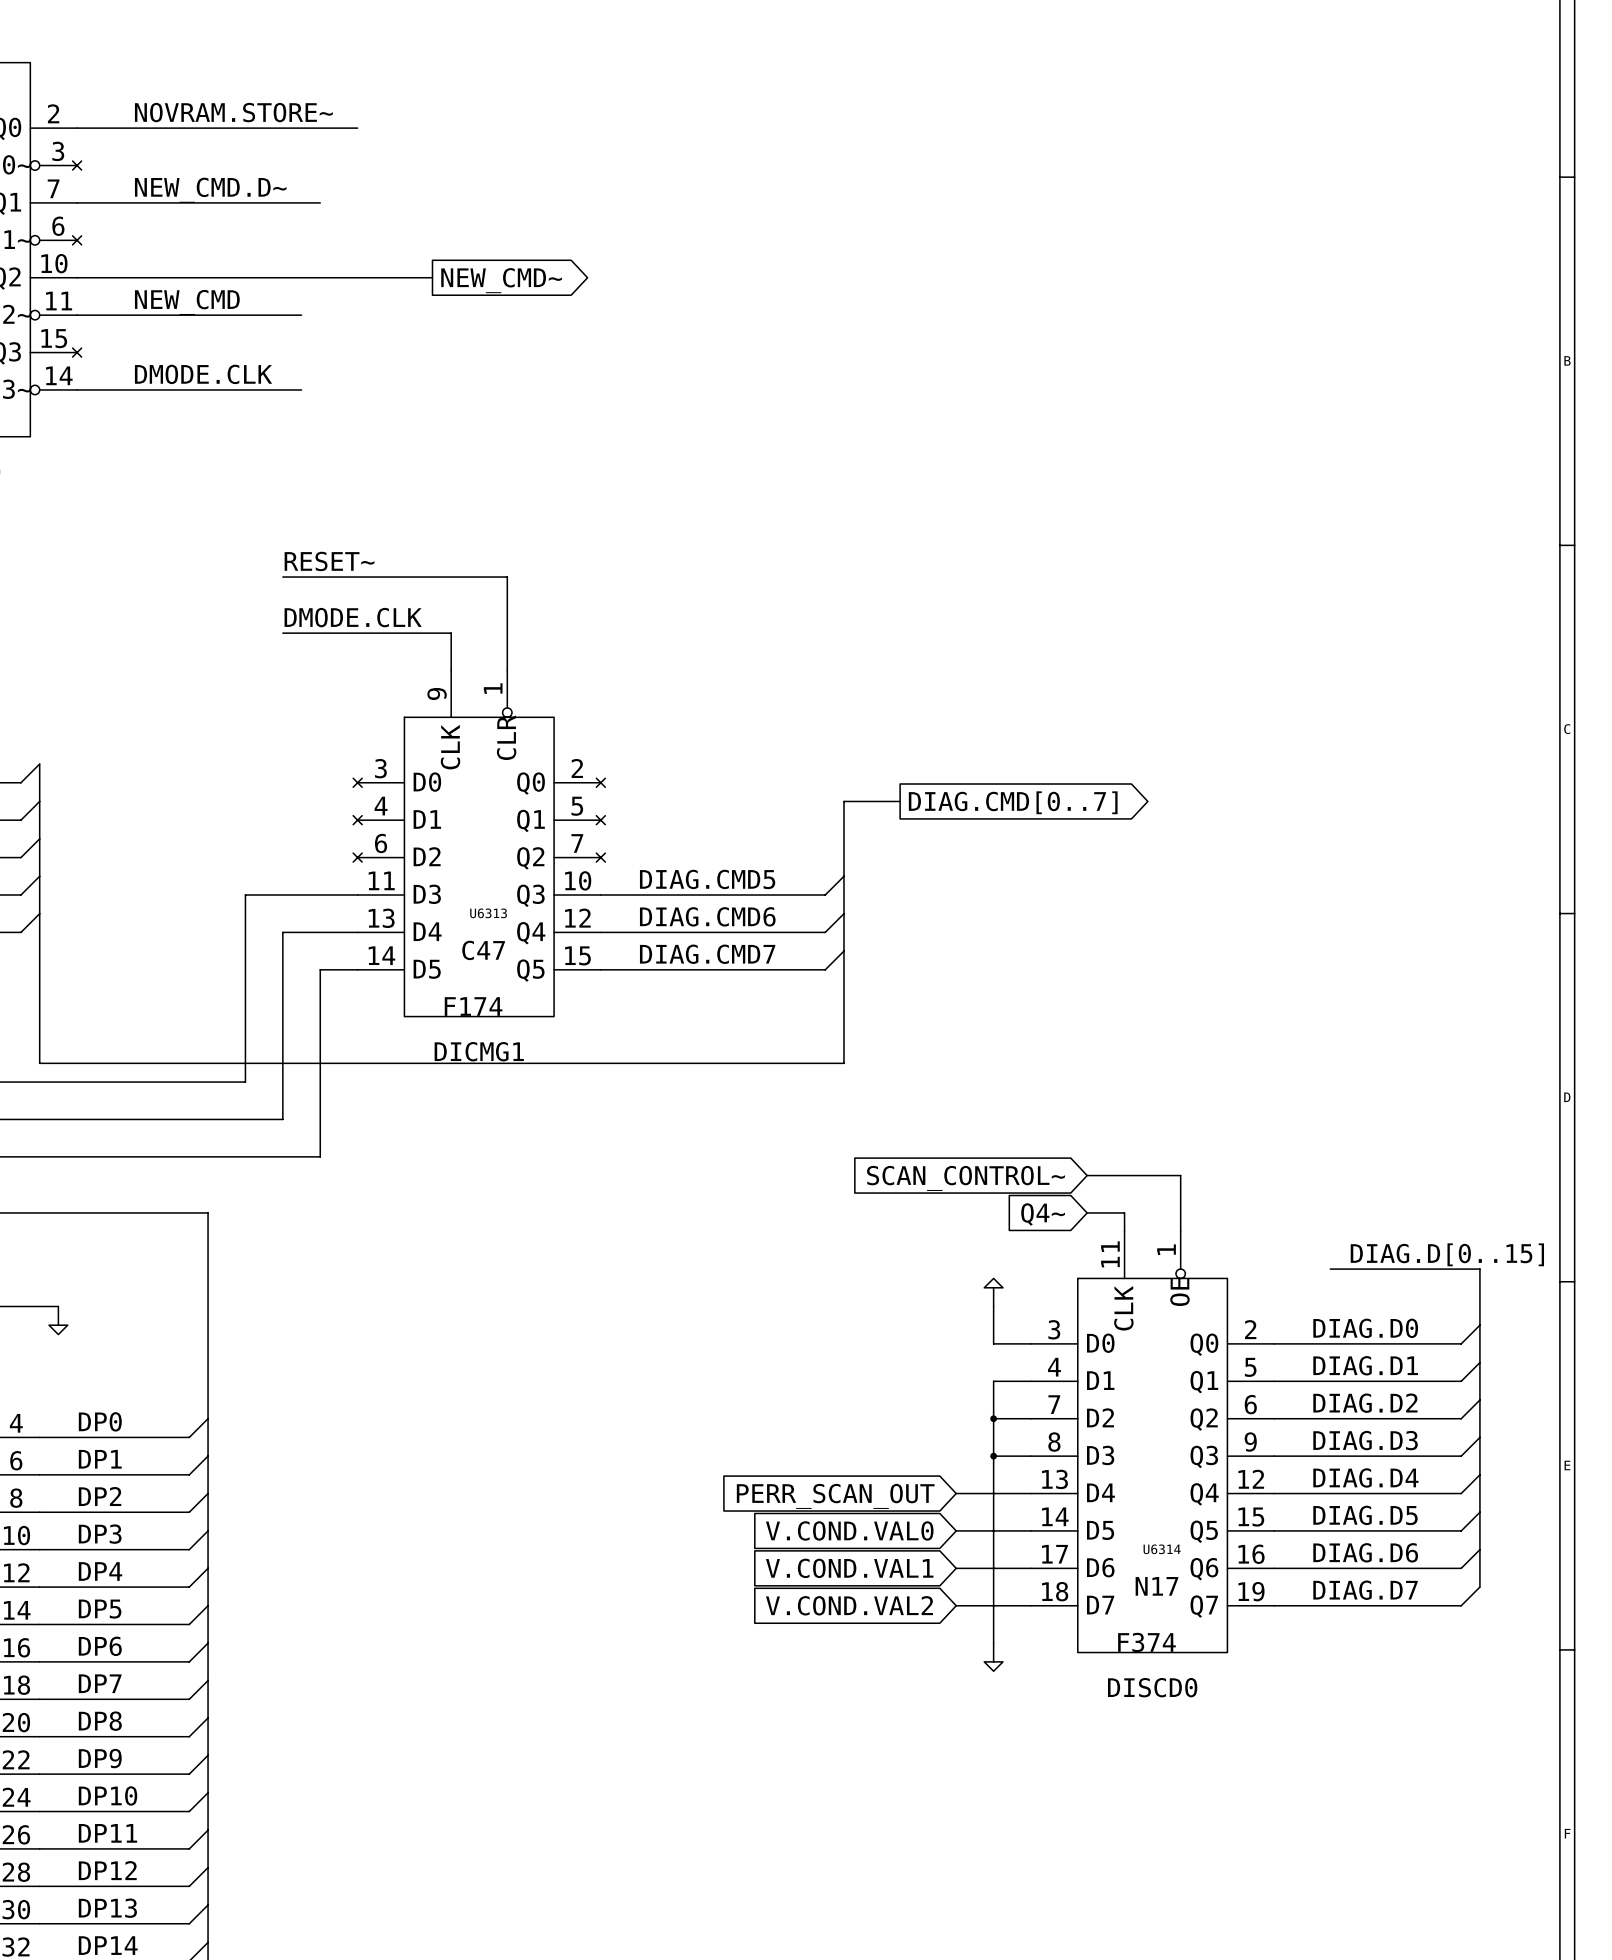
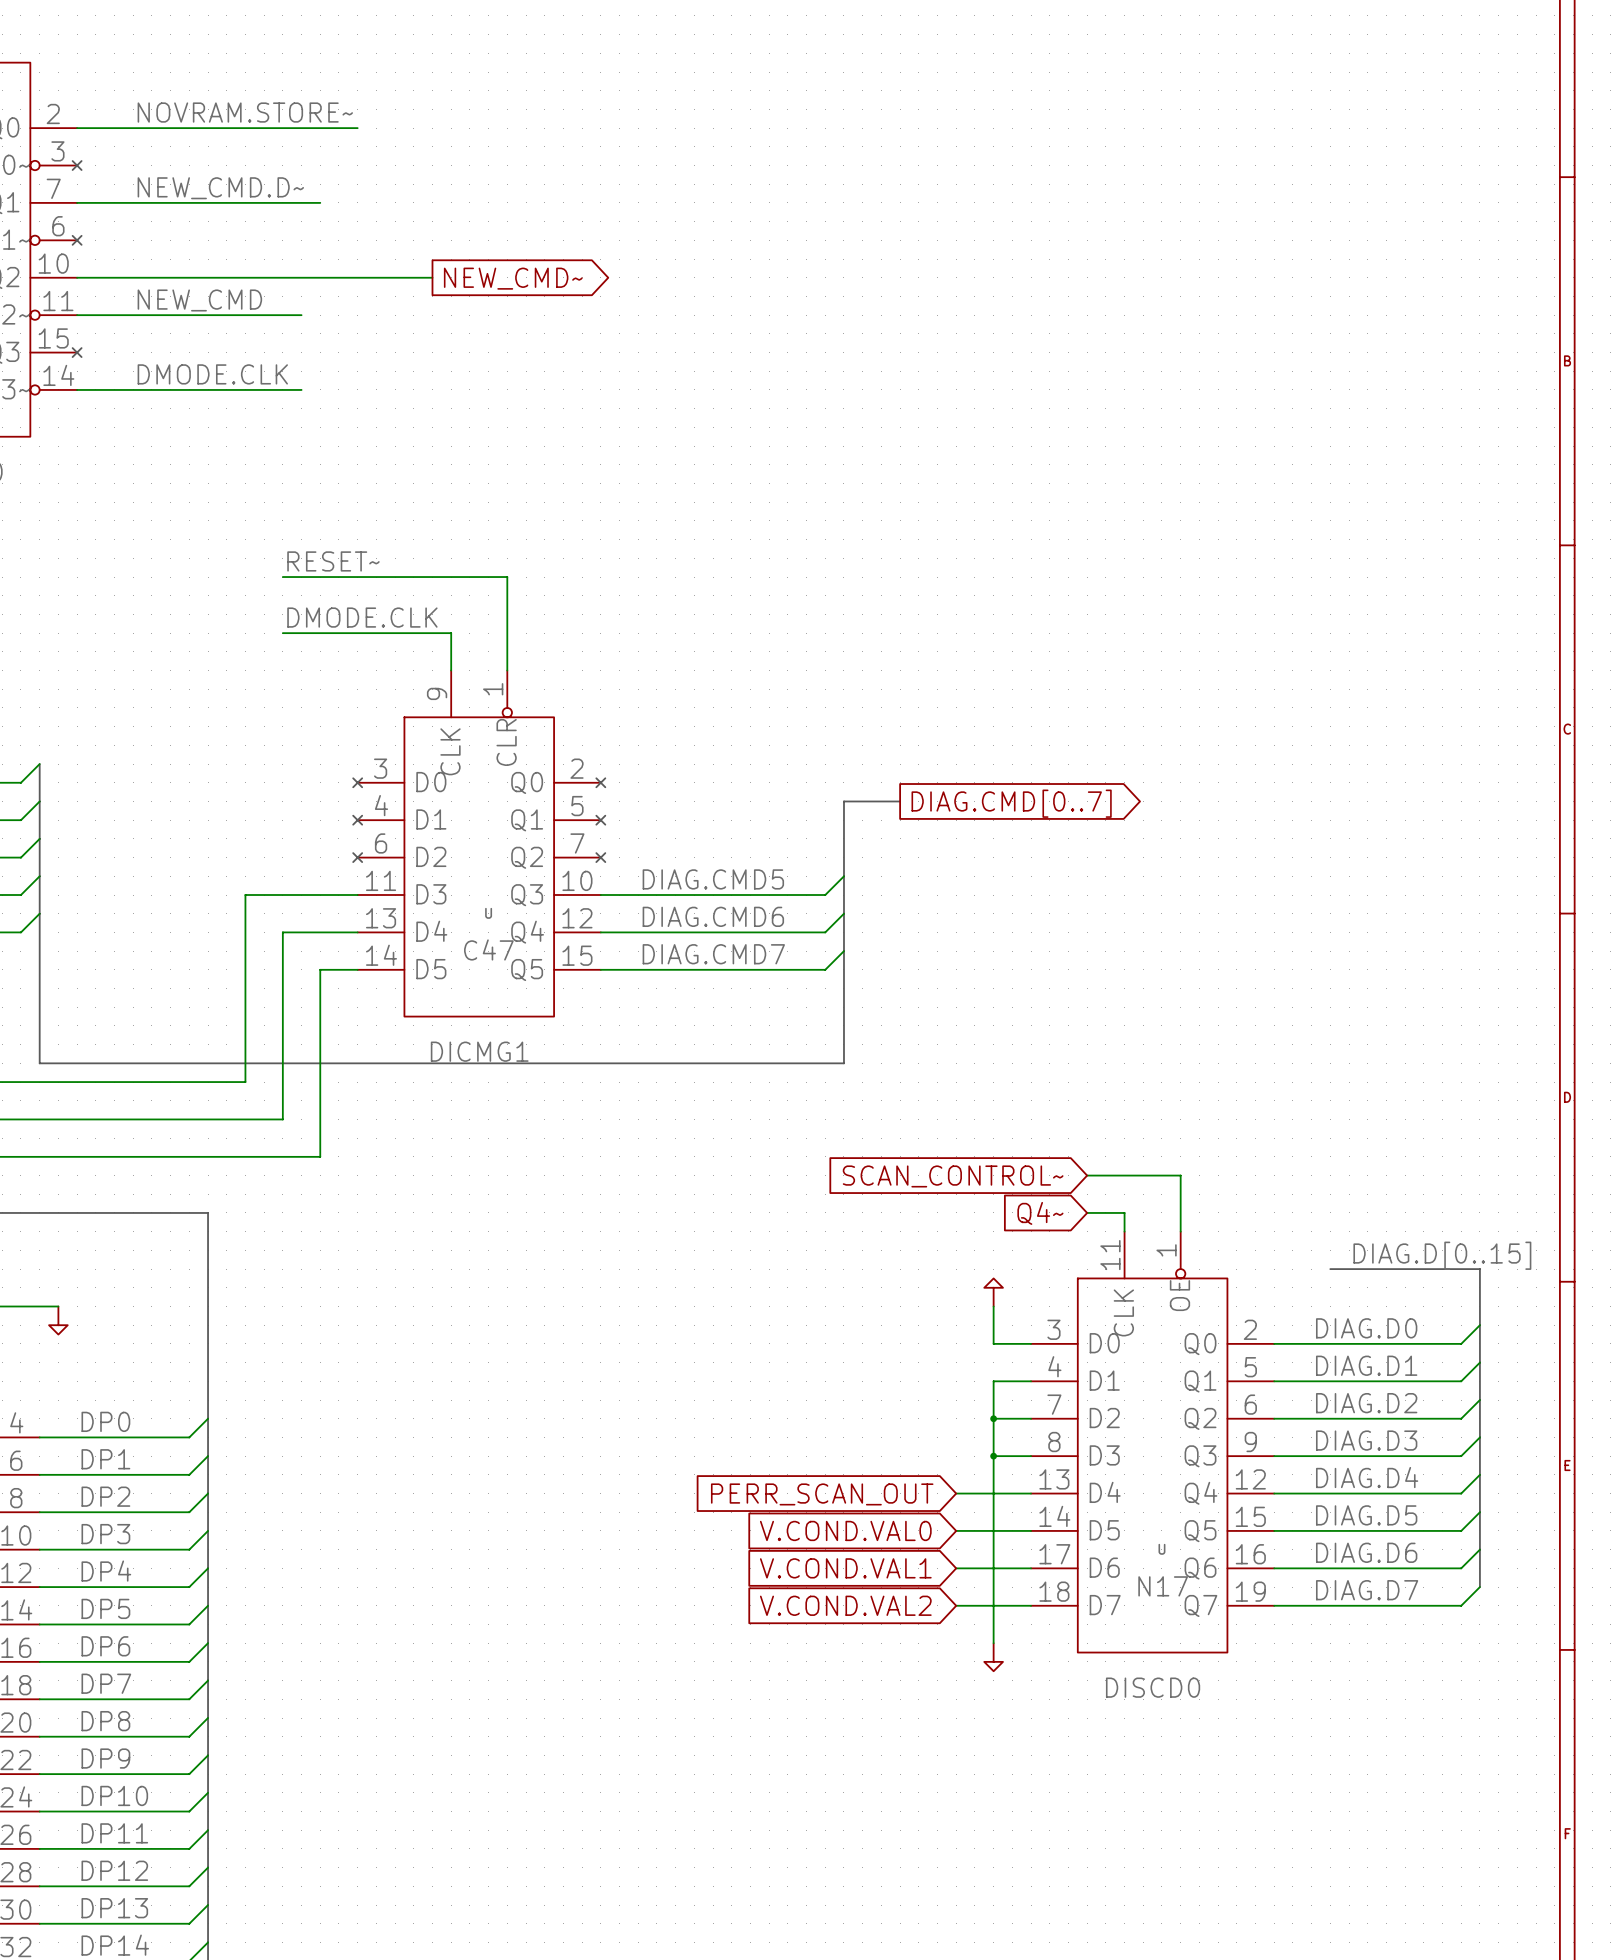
U6313 name: U6313 (488, 913) -> U (488, 913)
U6313 value: F174 (473, 1006) -> none
U6314 name: U6314 (1162, 1549) -> U (1161, 1549)
U6314 value: F374 (1146, 1642) -> none

